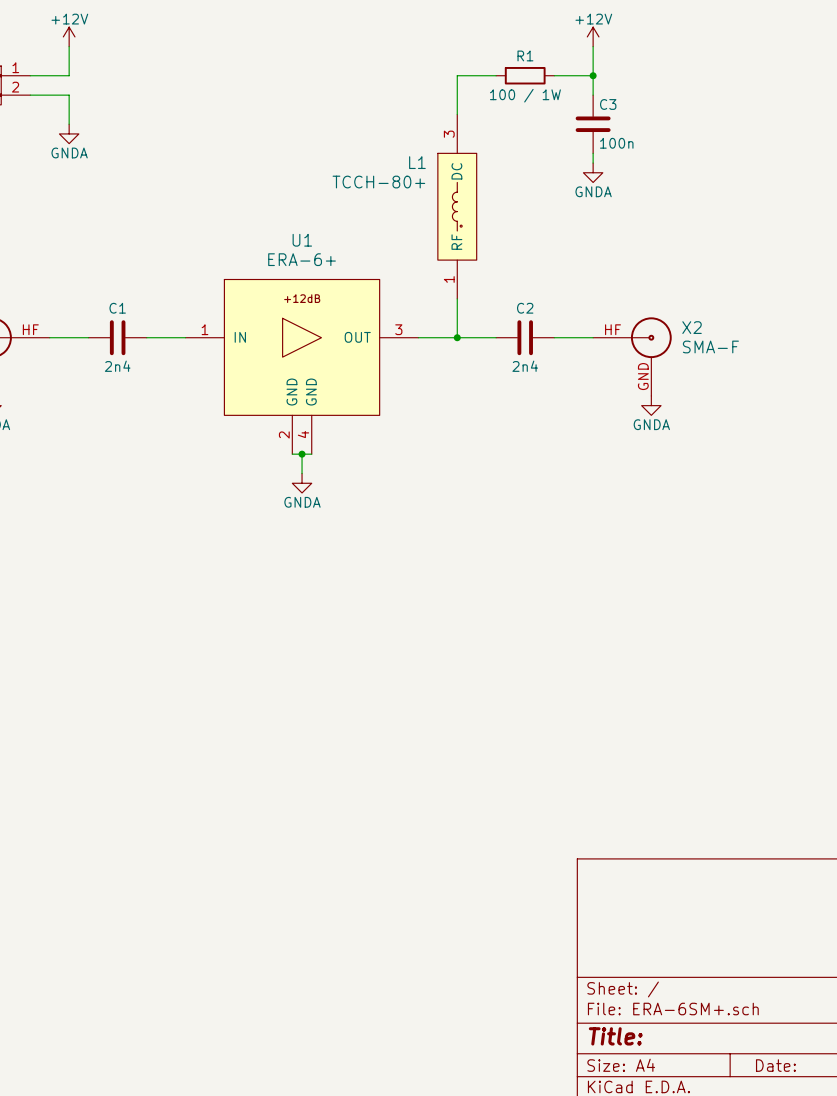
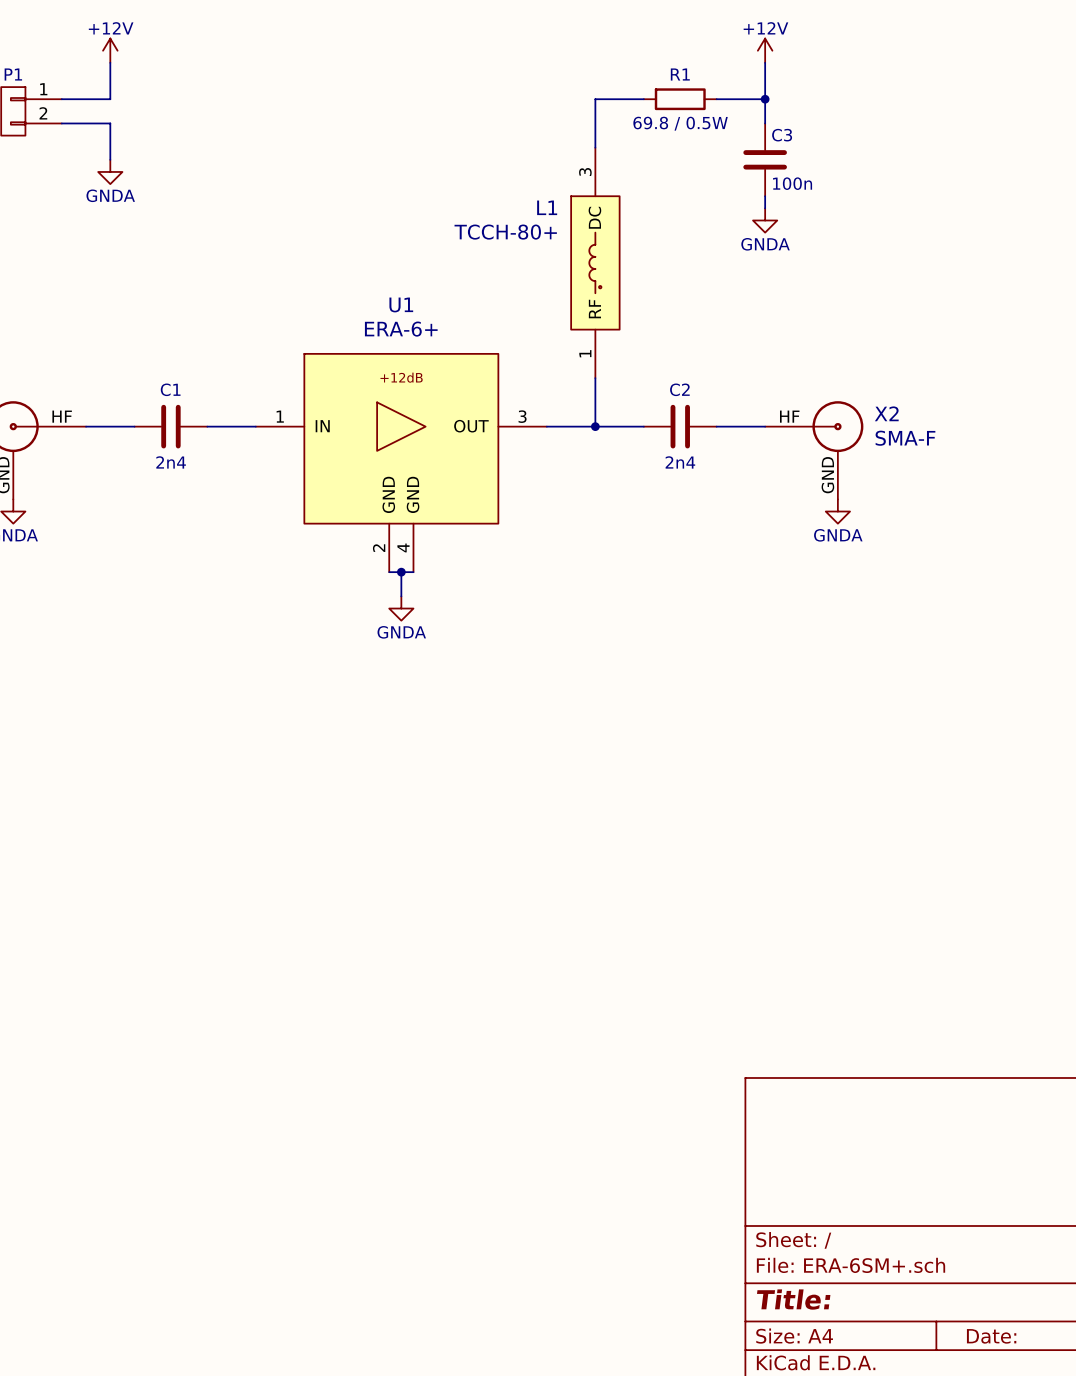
R1 value: 100 / 1W (525, 95) -> 69.8 / 0.5W (680, 123)

